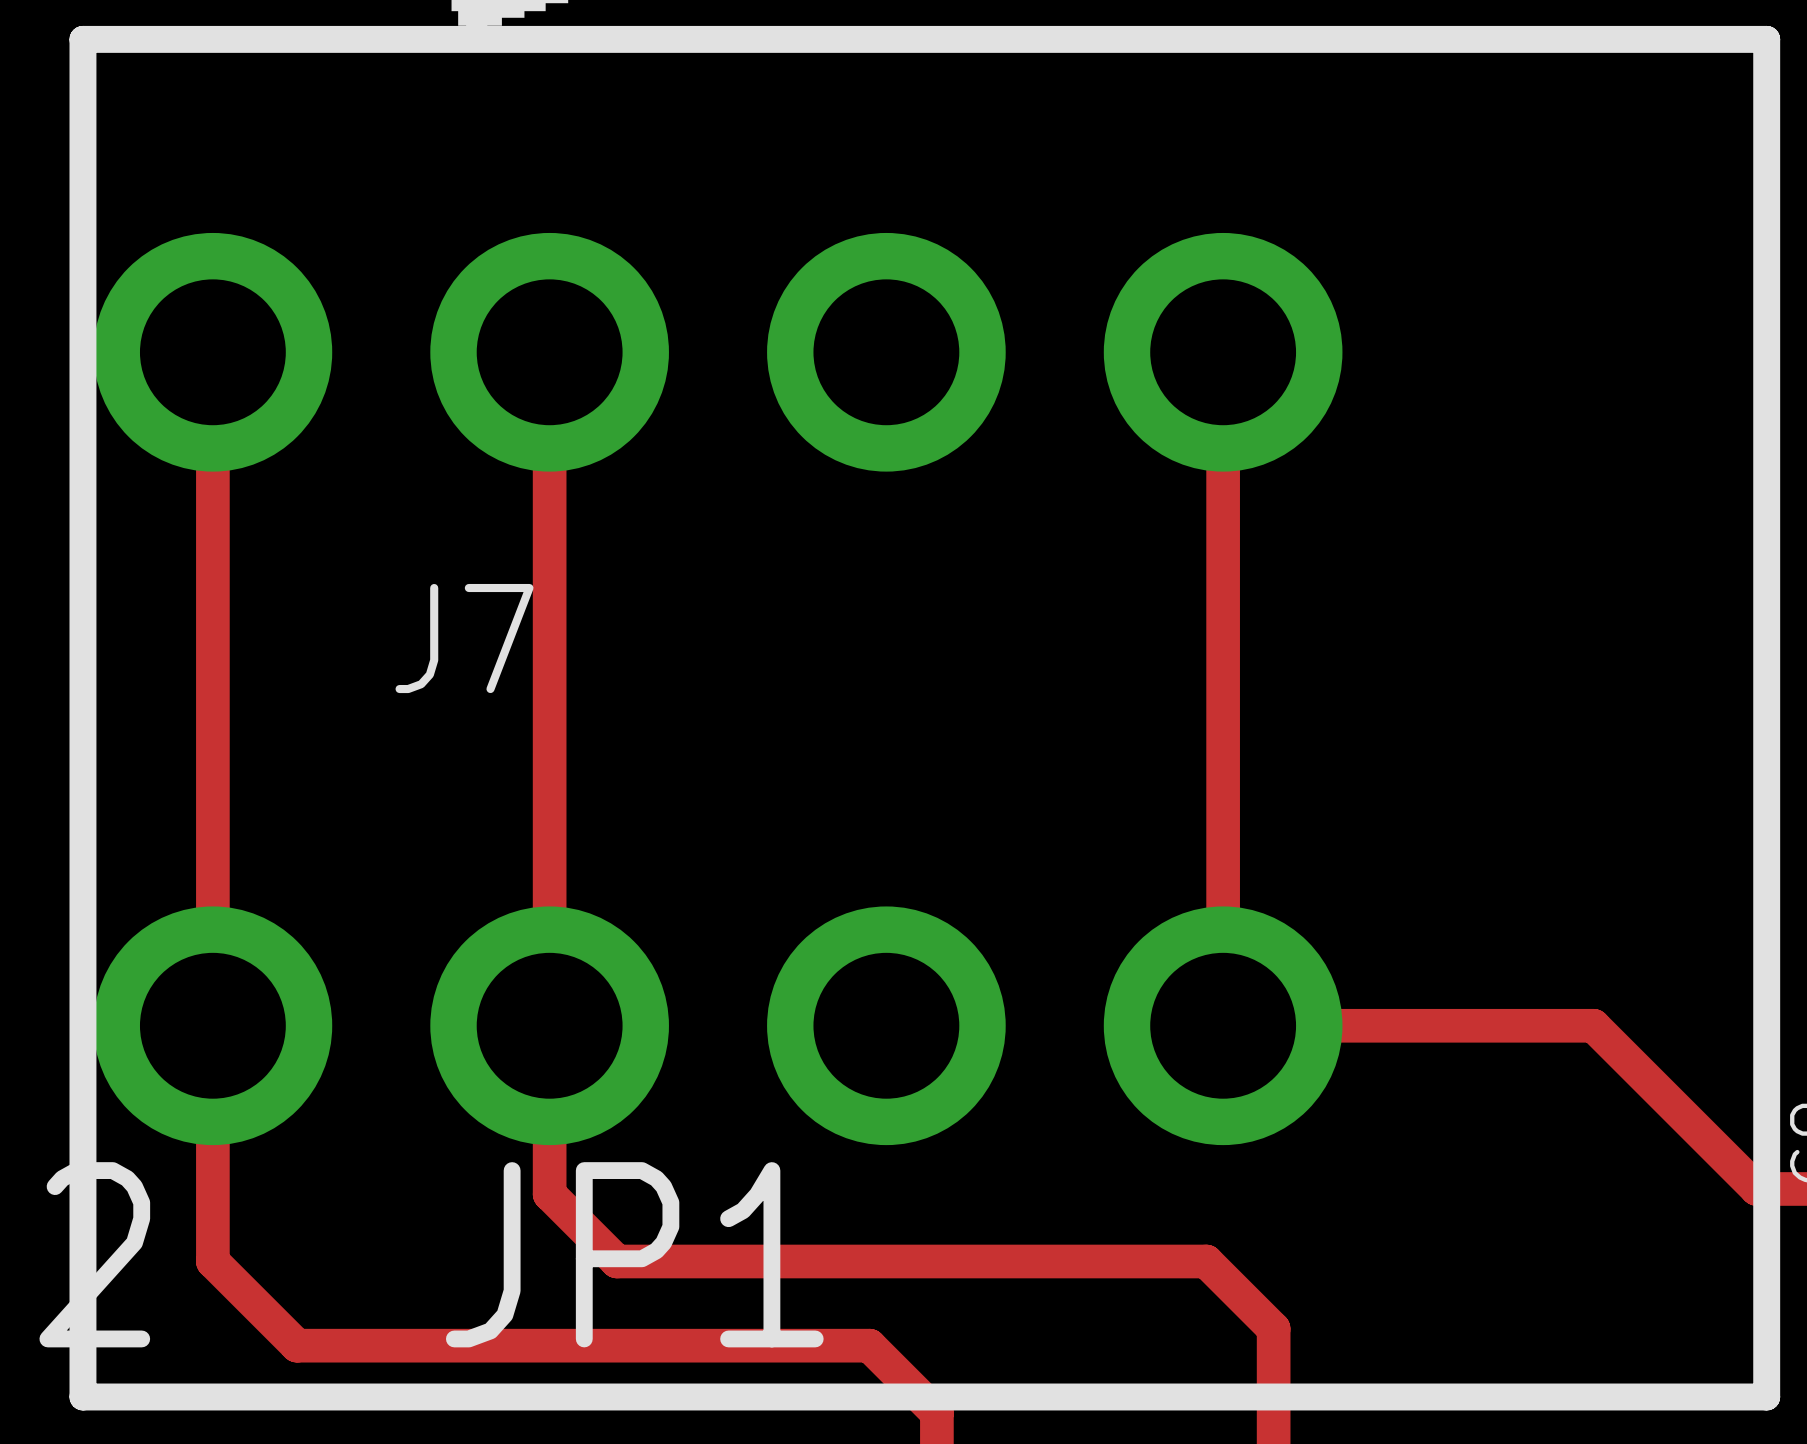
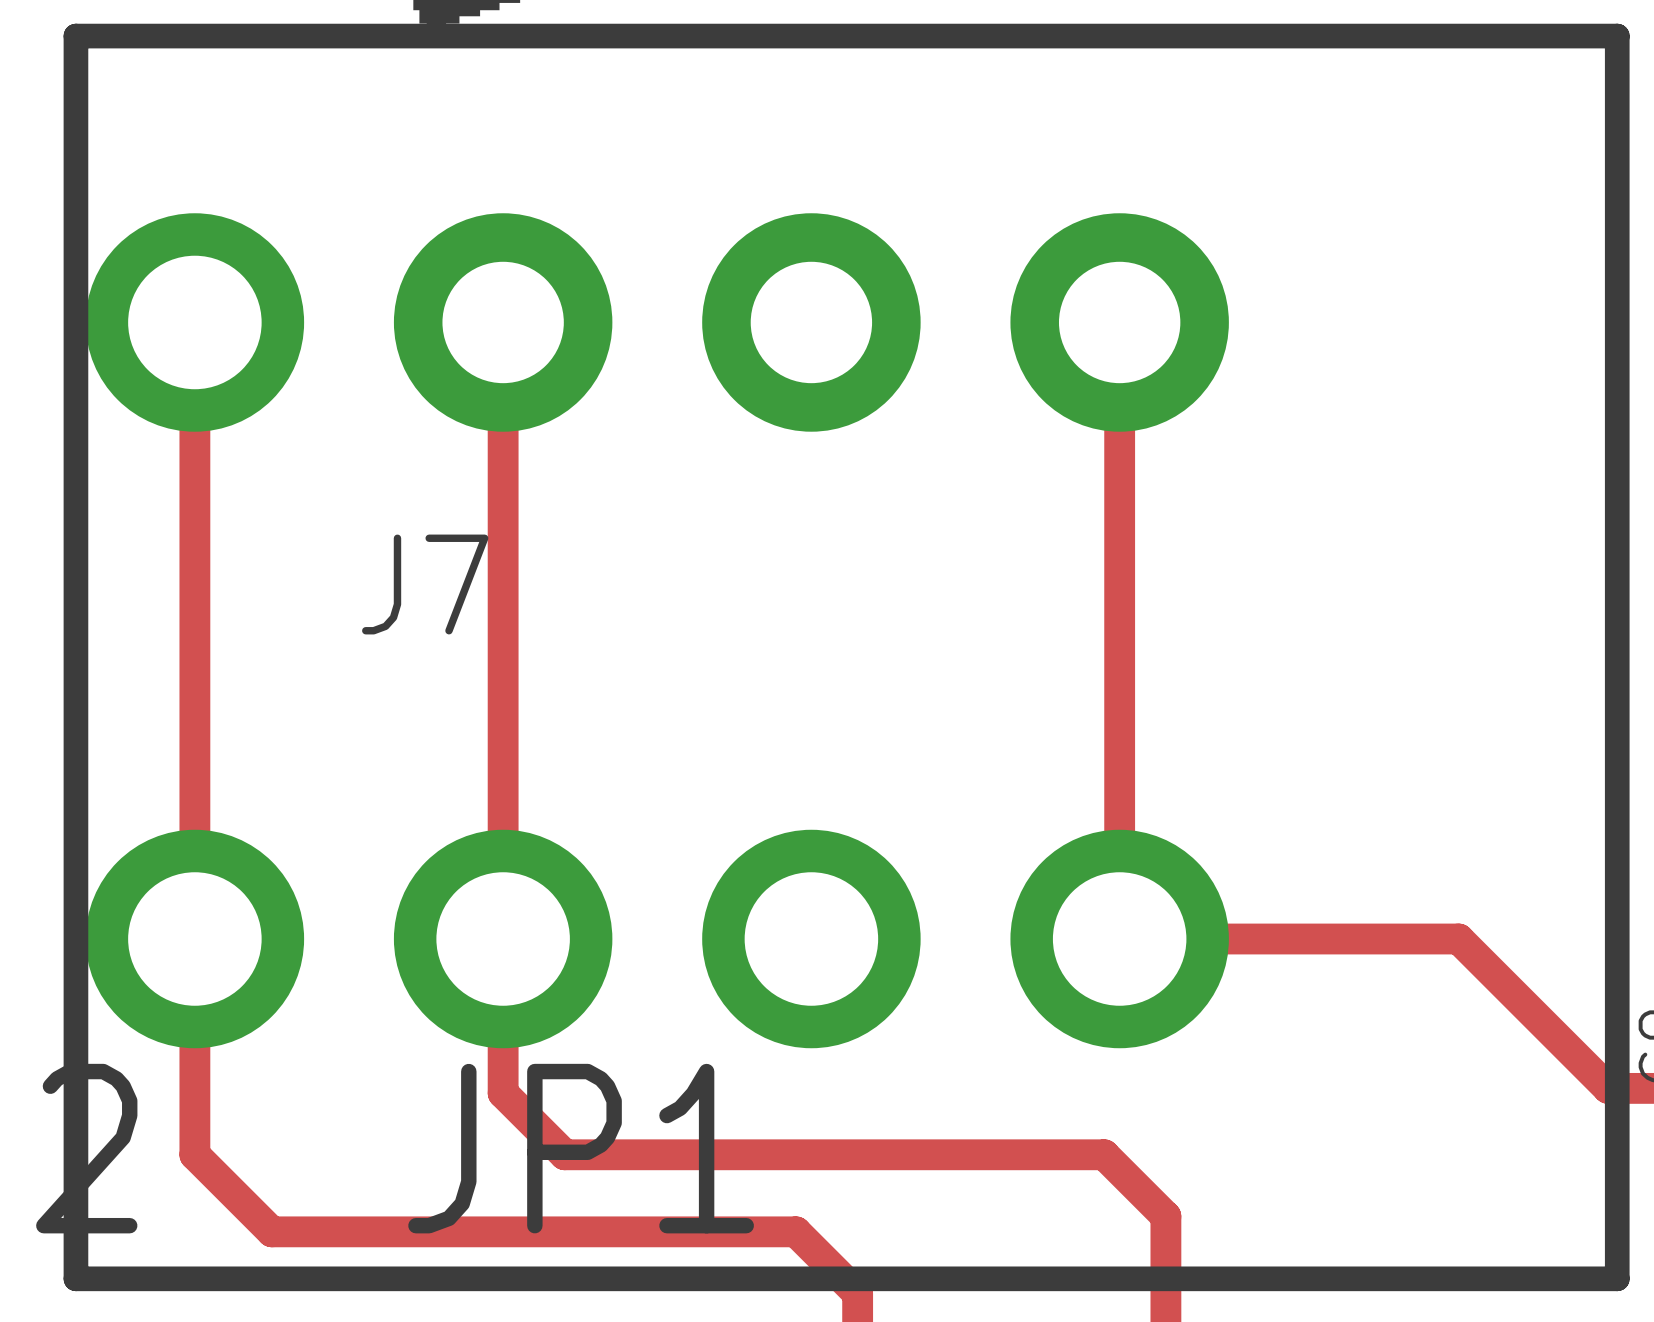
J7 footprint: [69, 25, 1781, 1411] -> [63, 23, 1630, 1292]

